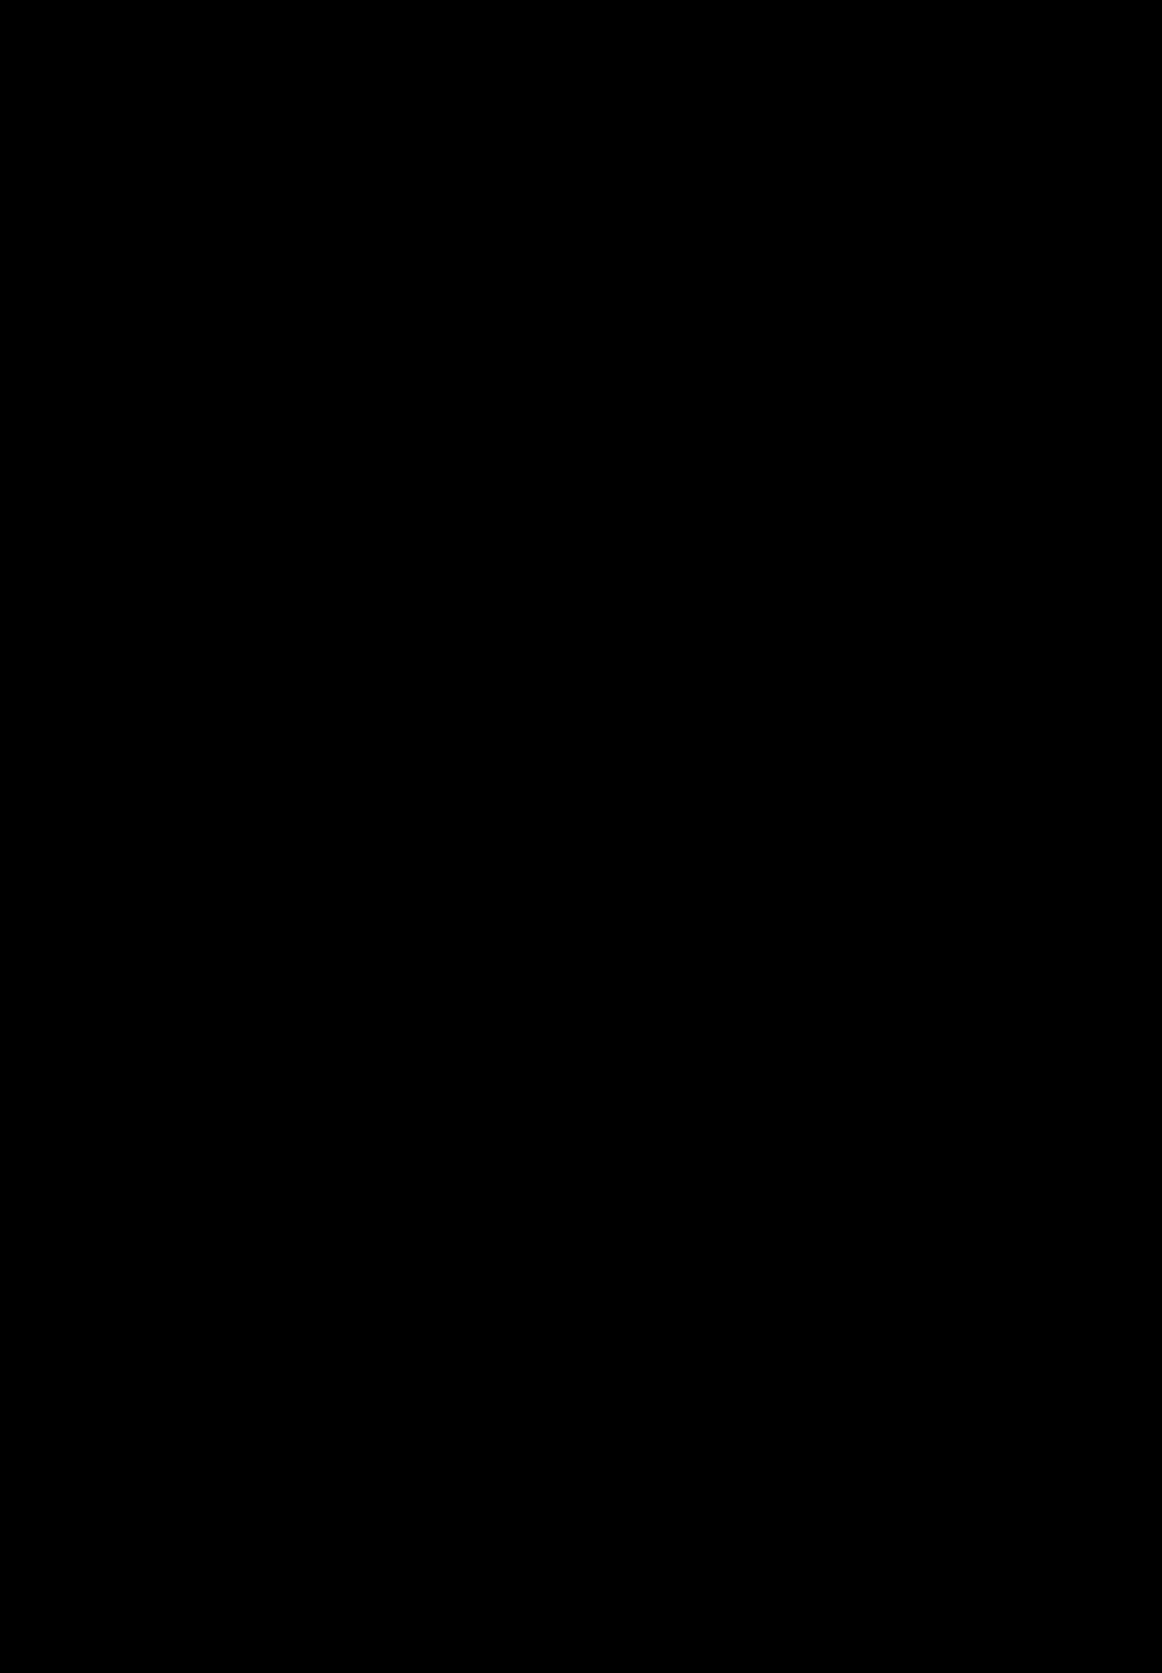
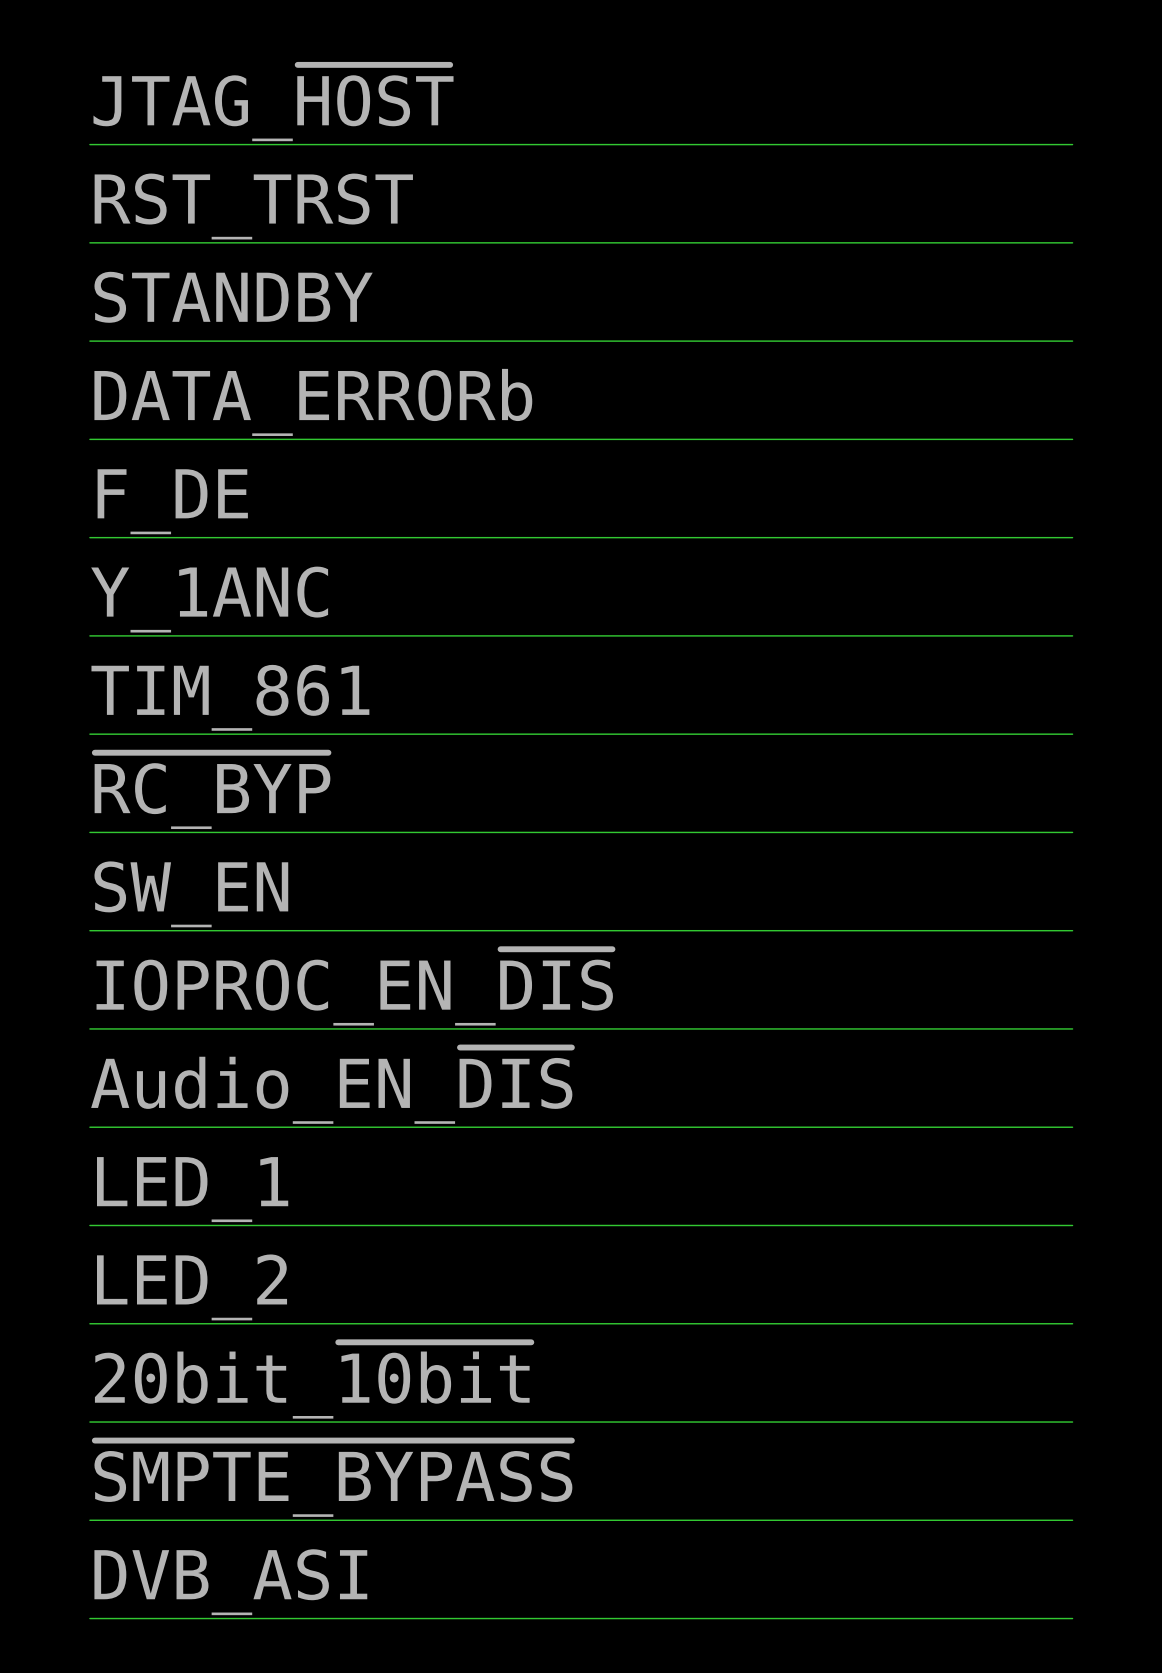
label: none -> JTAG_~{HOST} (273, 103)
wire: none -> (89, 144) (1072, 144)
label: none -> RST_TRST (253, 206)
wire: none -> (89, 242) (1072, 242)
label: none -> STANDBY (233, 297)
wire: none -> (89, 341) (1072, 341)
label: none -> DATA_ERRORb (313, 402)
wire: none -> (89, 439) (1072, 439)
label: none -> F_DE (172, 501)
wire: none -> (89, 537) (1072, 537)
label: none -> Y_1ANC (209, 599)
wire: none -> (89, 635) (1072, 635)
label: none -> TIM_861 (230, 697)
wire: none -> (89, 734) (1072, 734)
label: none -> ~{RC_BYP} (212, 790)
wire: none -> (89, 832) (1072, 832)
label: none -> SW_EN (191, 894)
wire: none -> (89, 930) (1072, 930)
label: none -> IOPROC_EN_~{DIS} (354, 987)
wire: none -> (89, 1028) (1072, 1028)
label: none -> Audio_EN_~{DIS} (331, 1085)
wire: none -> (89, 1127) (1072, 1127)
label: none -> LED_1 (192, 1189)
wire: none -> (89, 1225) (1072, 1225)
label: none -> LED_2 (192, 1287)
wire: none -> (89, 1323) (1072, 1323)
label: none -> 20bit_~{10bit} (313, 1380)
wire: none -> (89, 1422) (1072, 1422)
label: none -> ~{SMPTE_BYPASS} (333, 1478)
wire: none -> (89, 1520) (1072, 1520)
label: none -> DVB_ASI (230, 1582)
wire: none -> (89, 1618) (1072, 1618)

